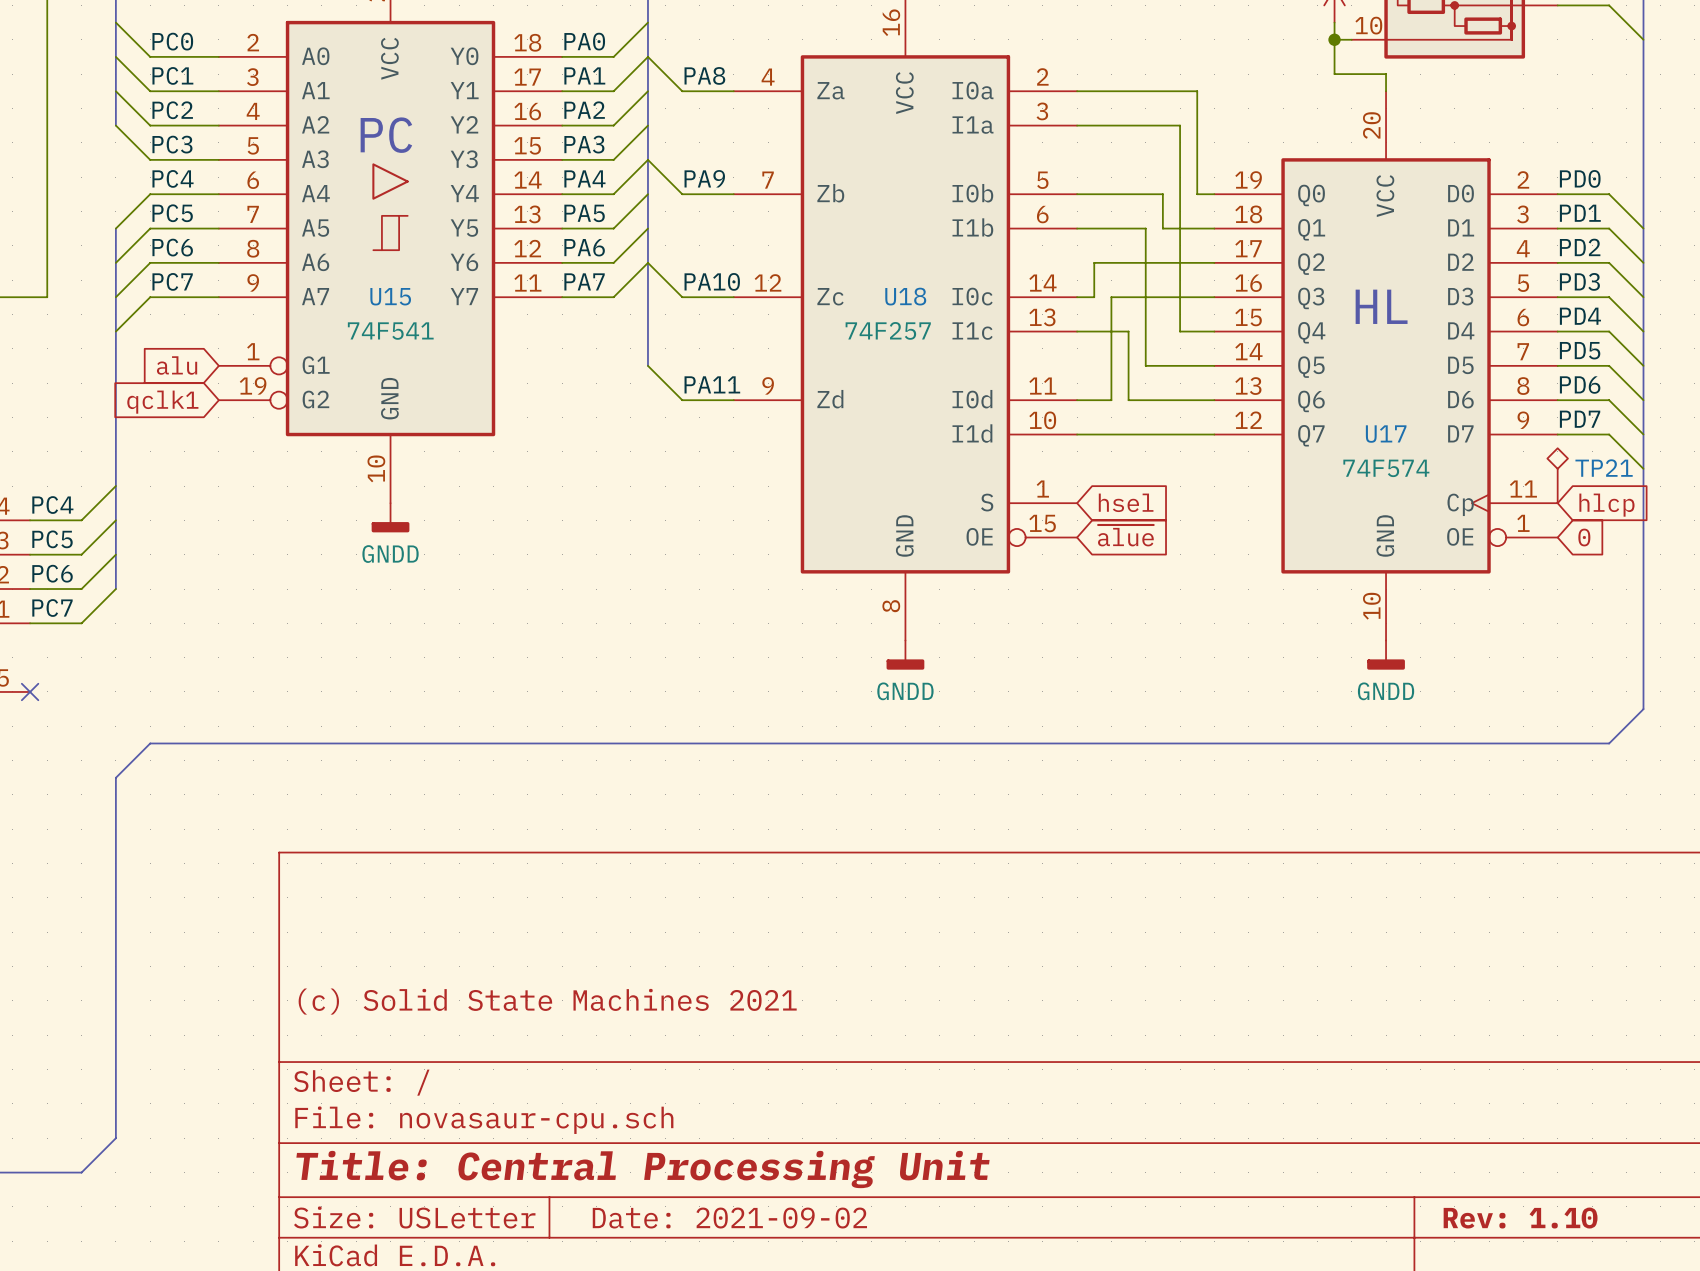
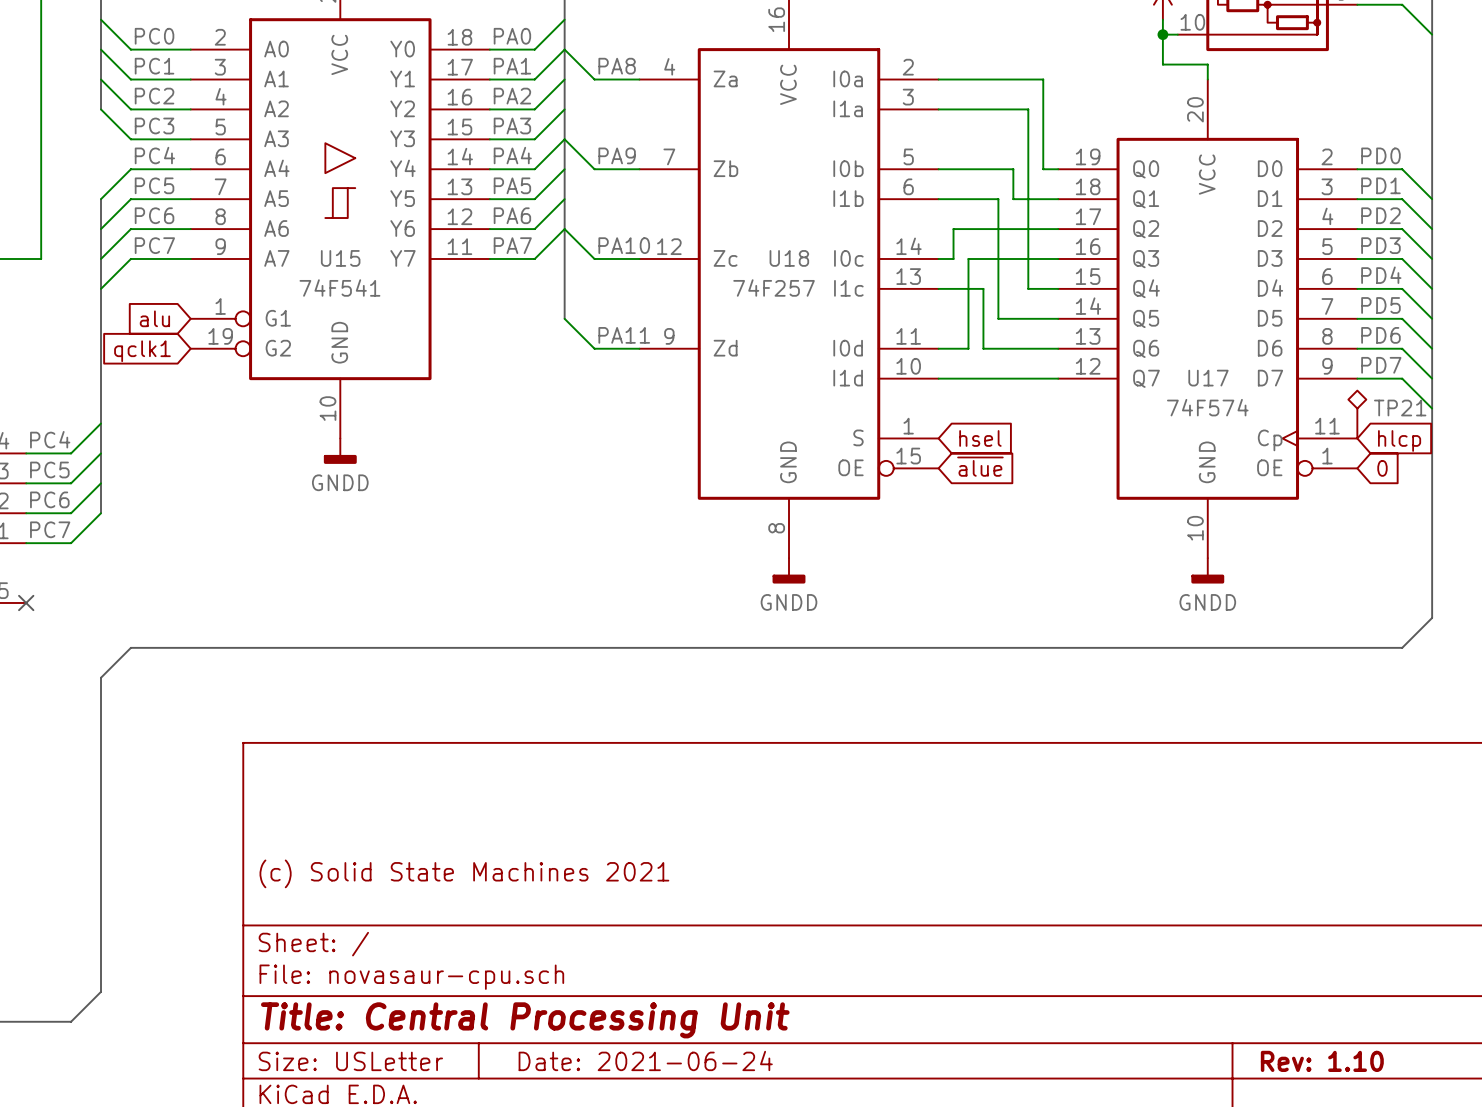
text: PC (386, 135) -> none
text: HL (1381, 306) -> none
title block: Date: 2021-09-02 (729, 1218) -> Date: 2021-06-24 (645, 1060)

